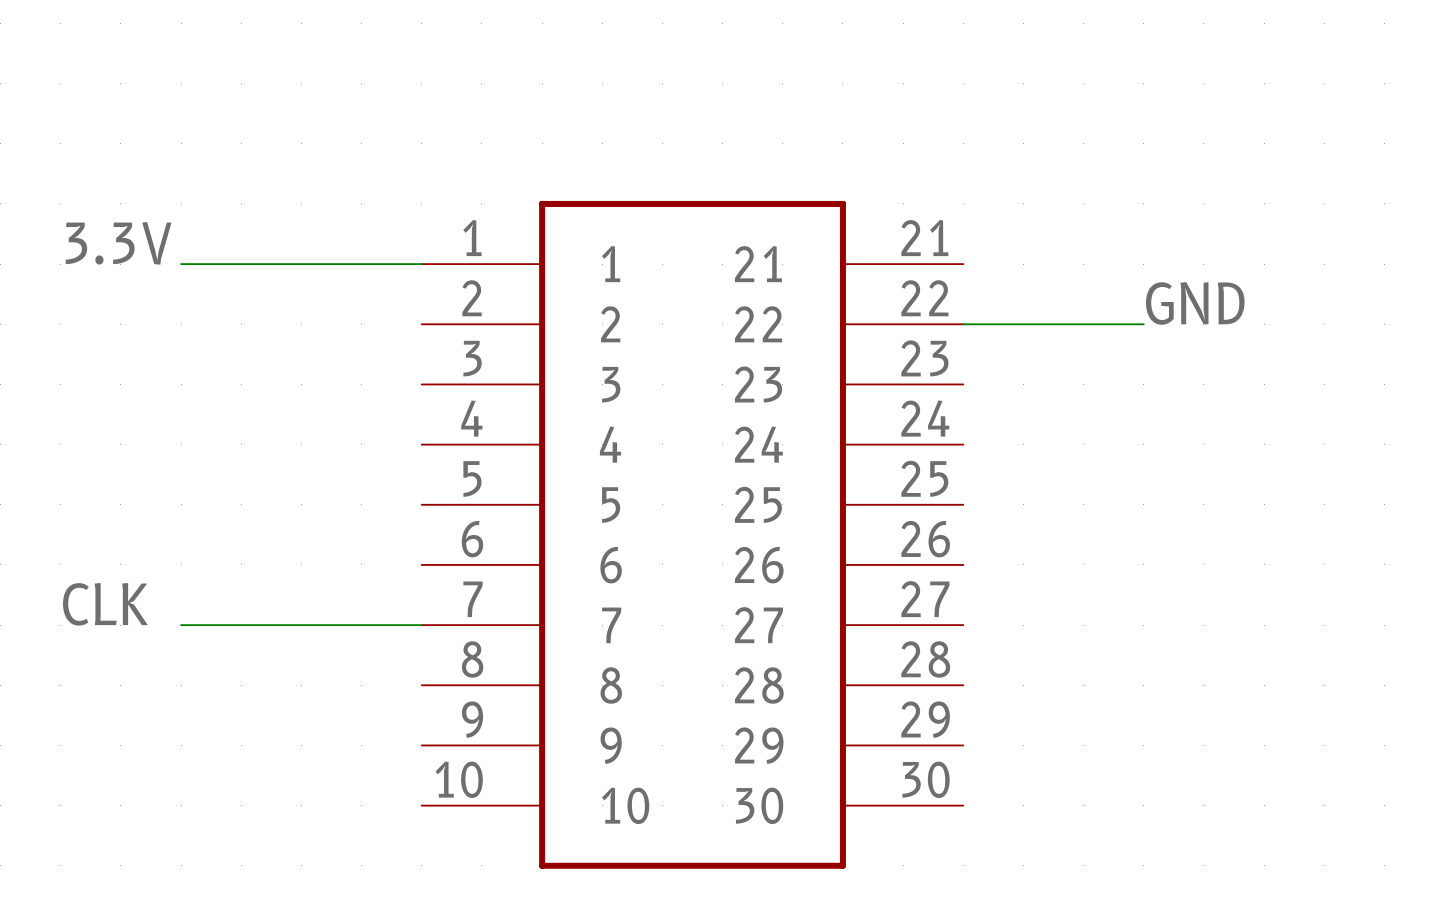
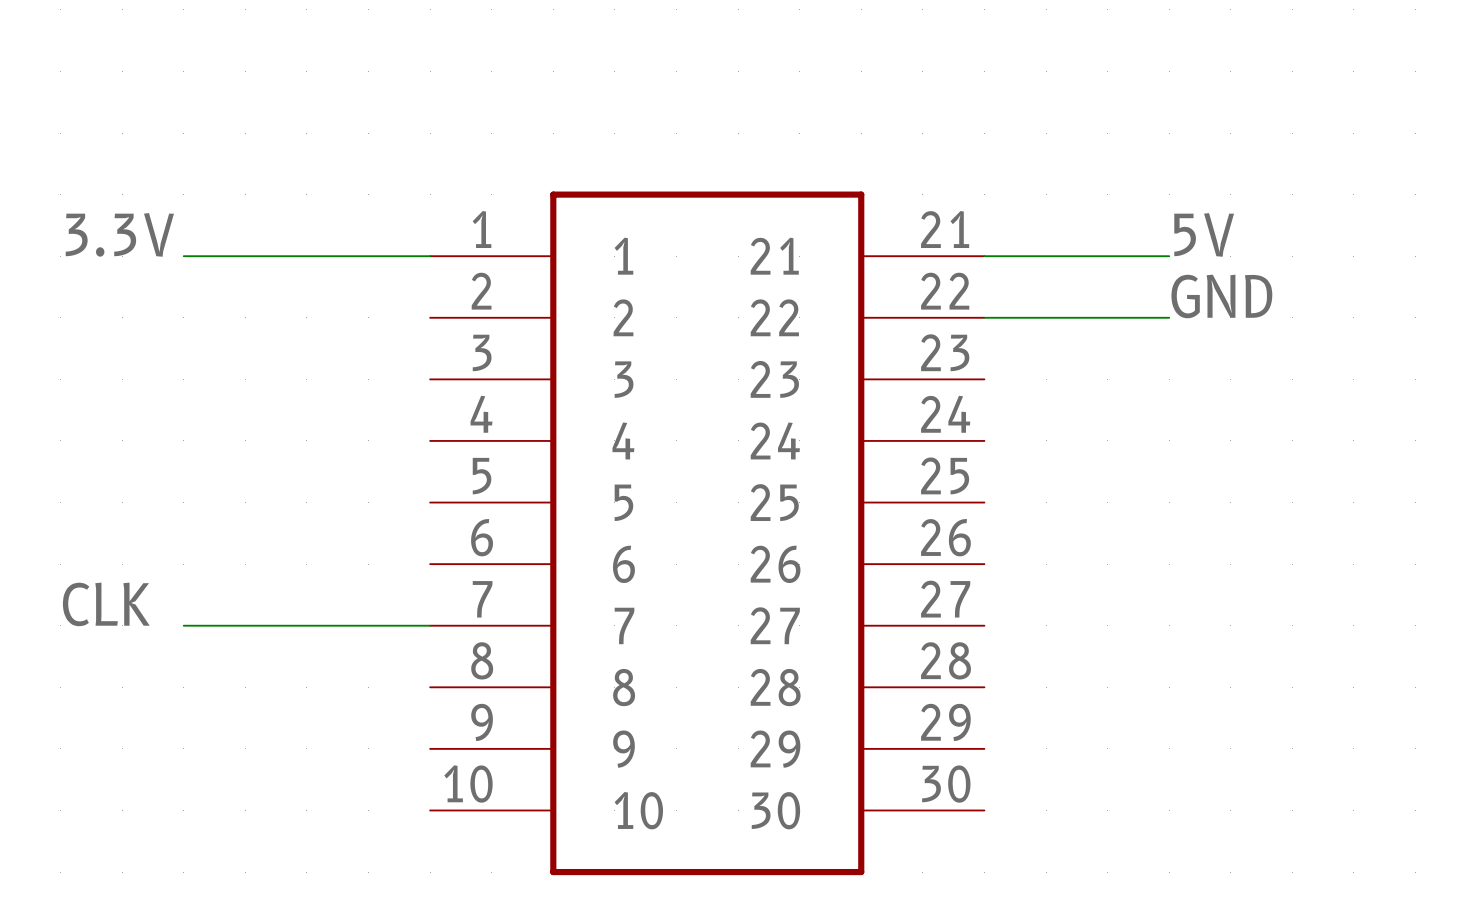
label: none -> 5V (1204, 234)
wire: none -> (984, 256) (1169, 256)

